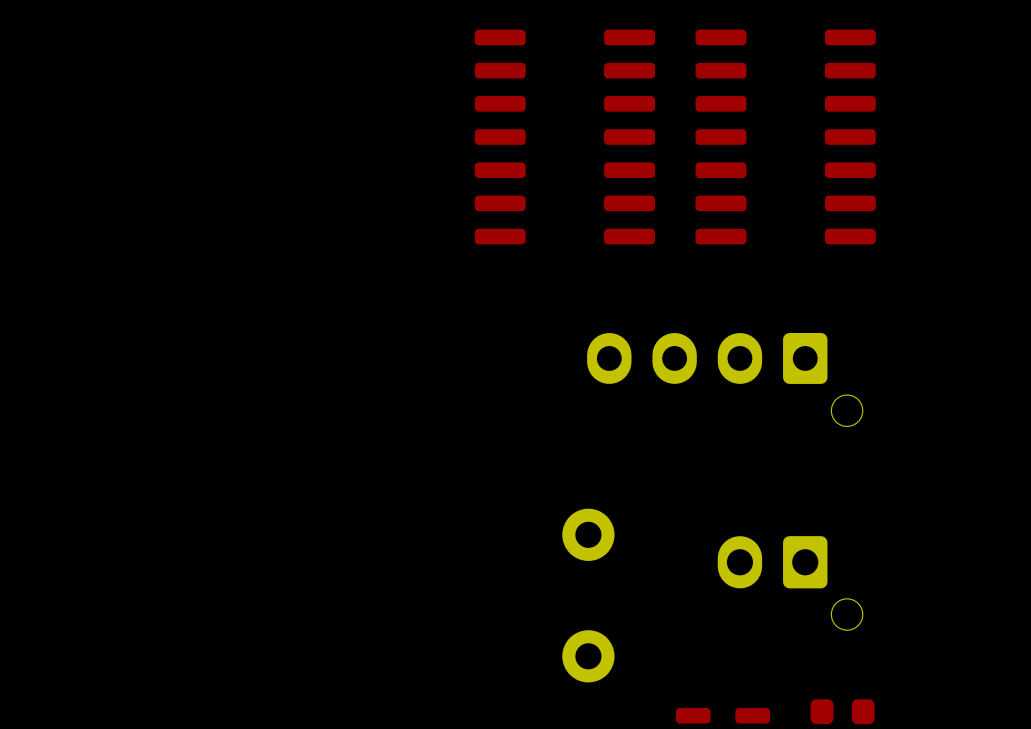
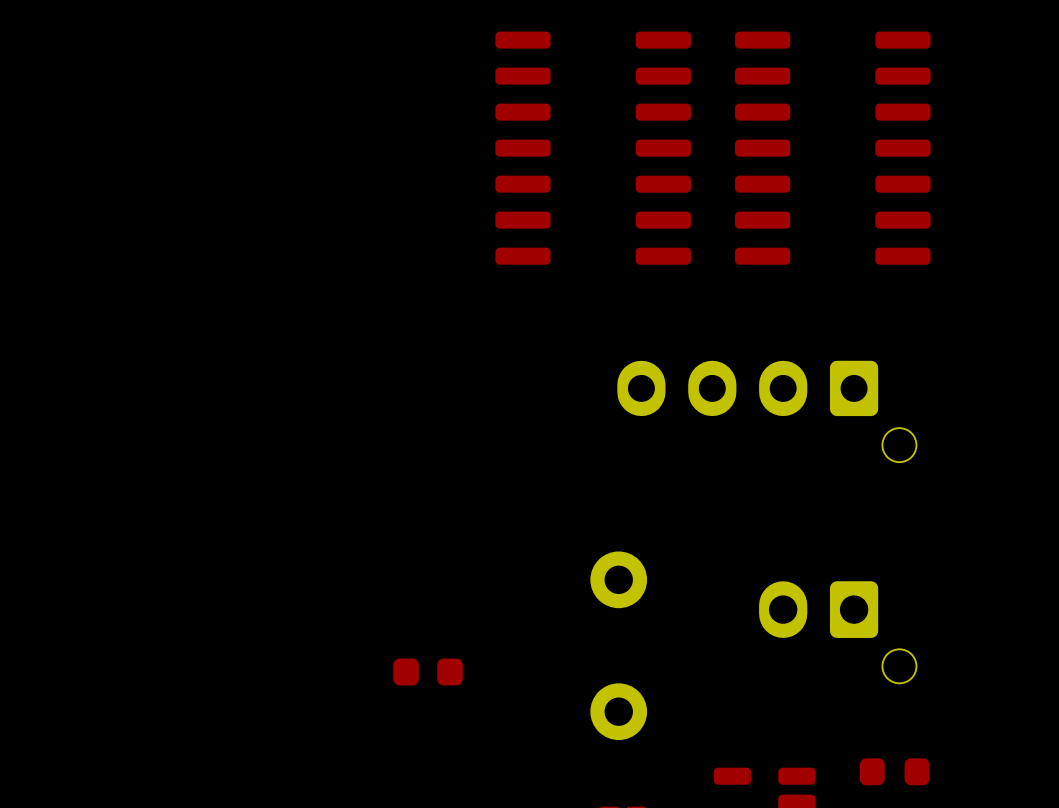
part: none -> (428, 671)

